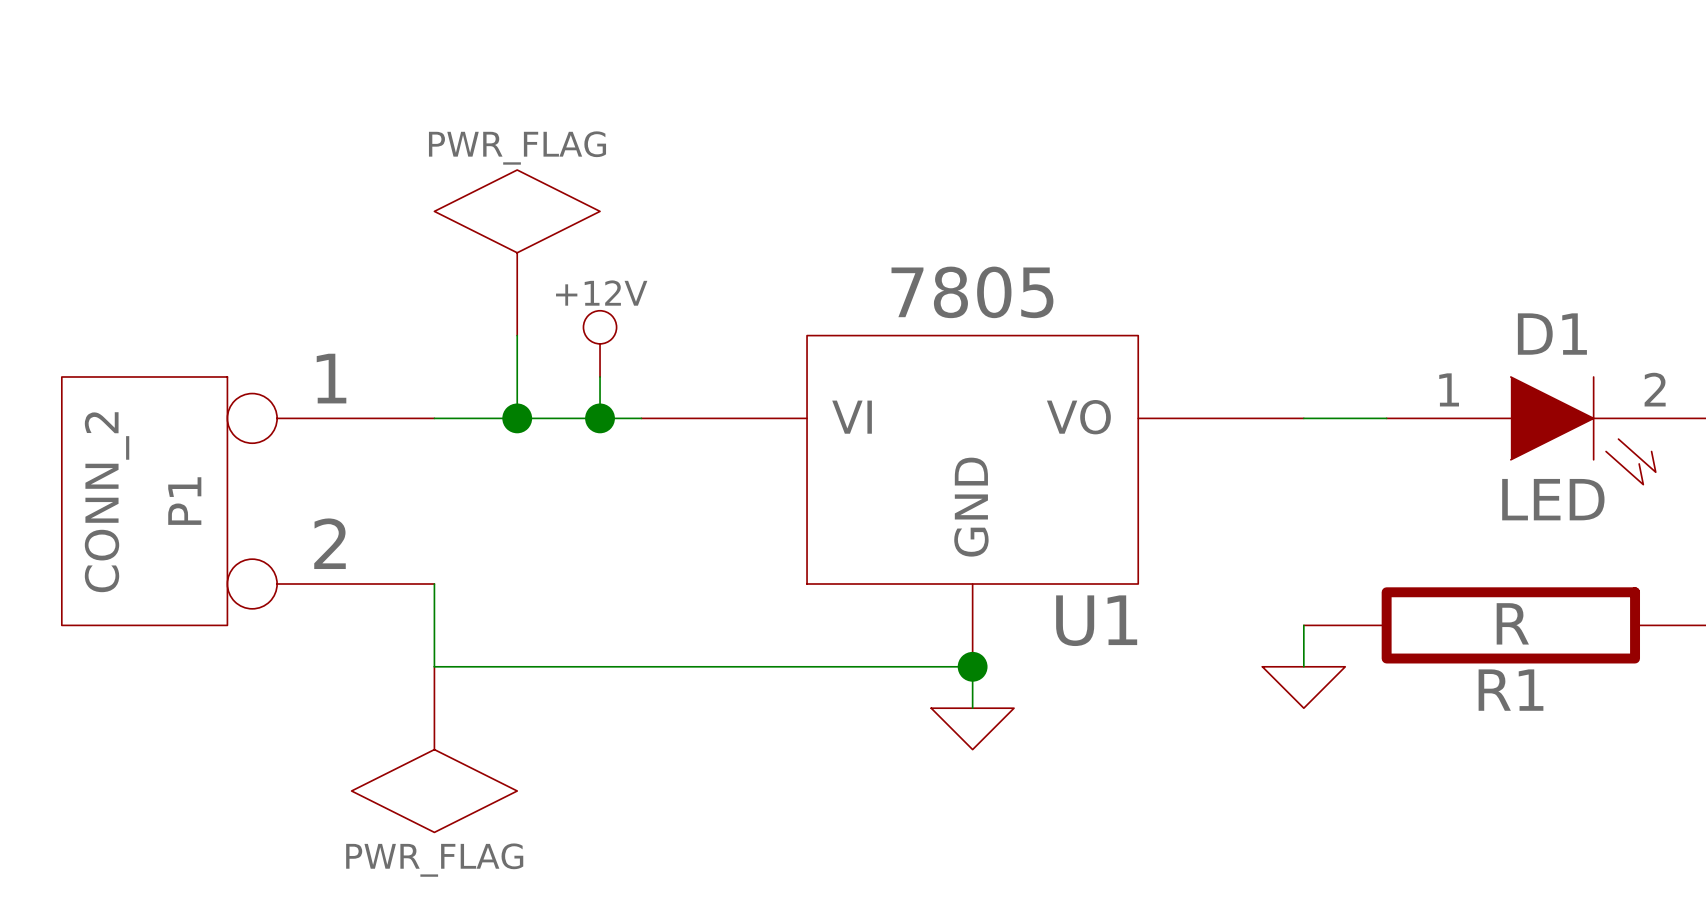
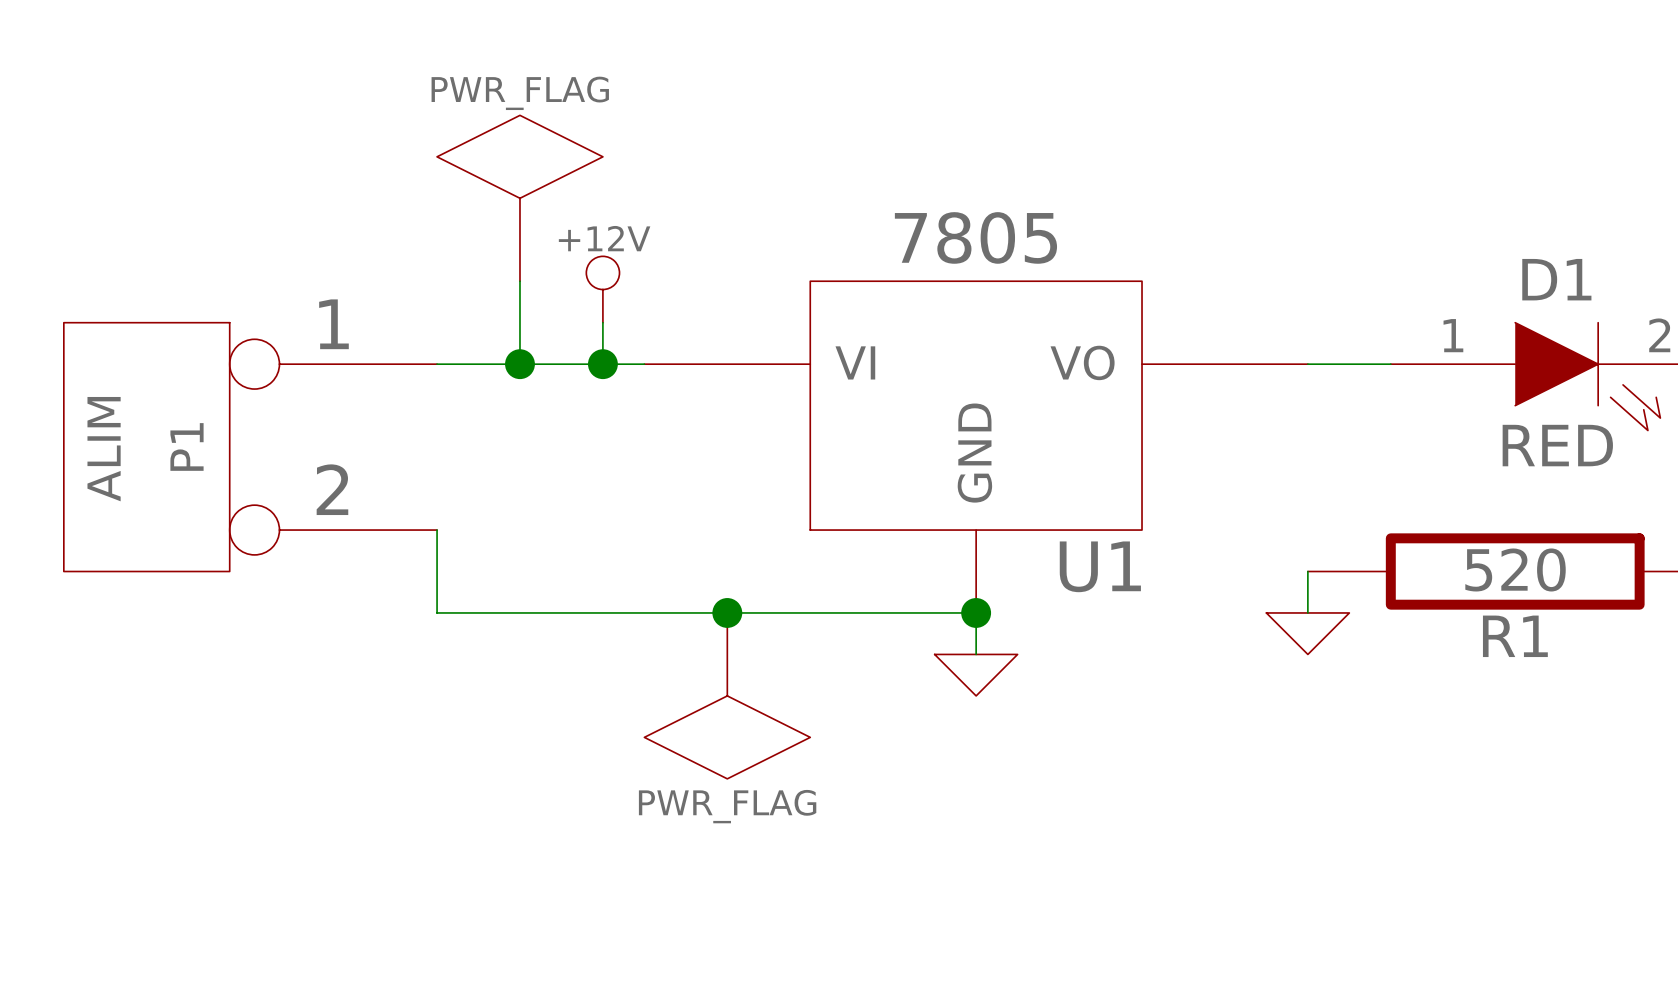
D1 value: LED (1553, 499) -> RED (1557, 445)
P1 value: CONN_2 (107, 502) -> ALIM (104, 449)
R1 value: R (1512, 623) -> 520 (1515, 569)
junction: none -> (727, 612)
power symbol position: PWR_FLAG (434, 749) -> PWR_FLAG (727, 695)

